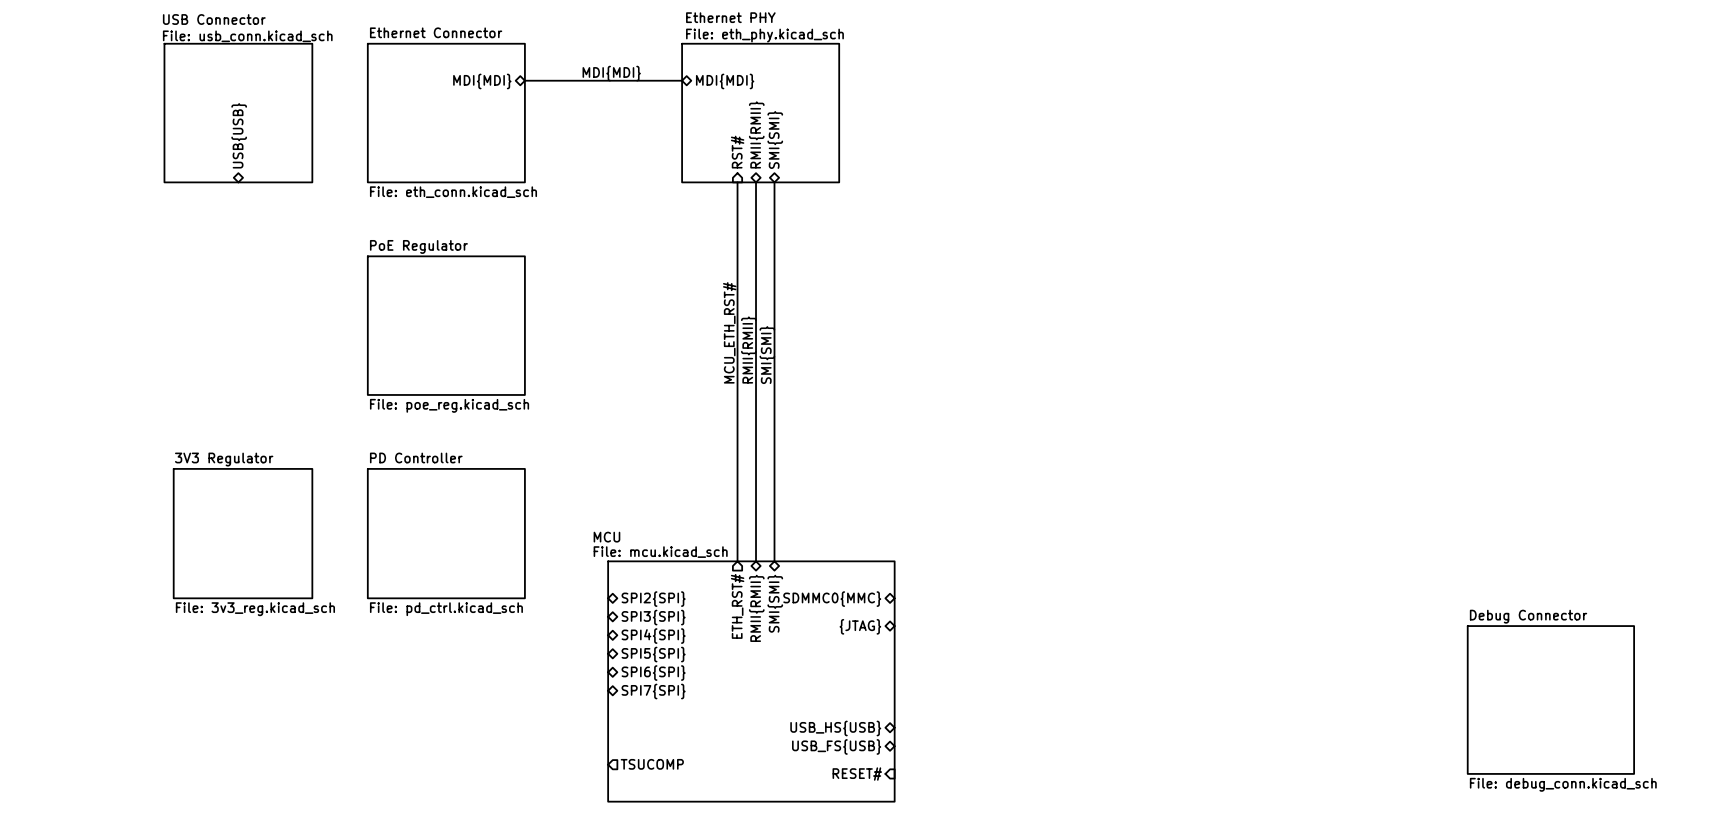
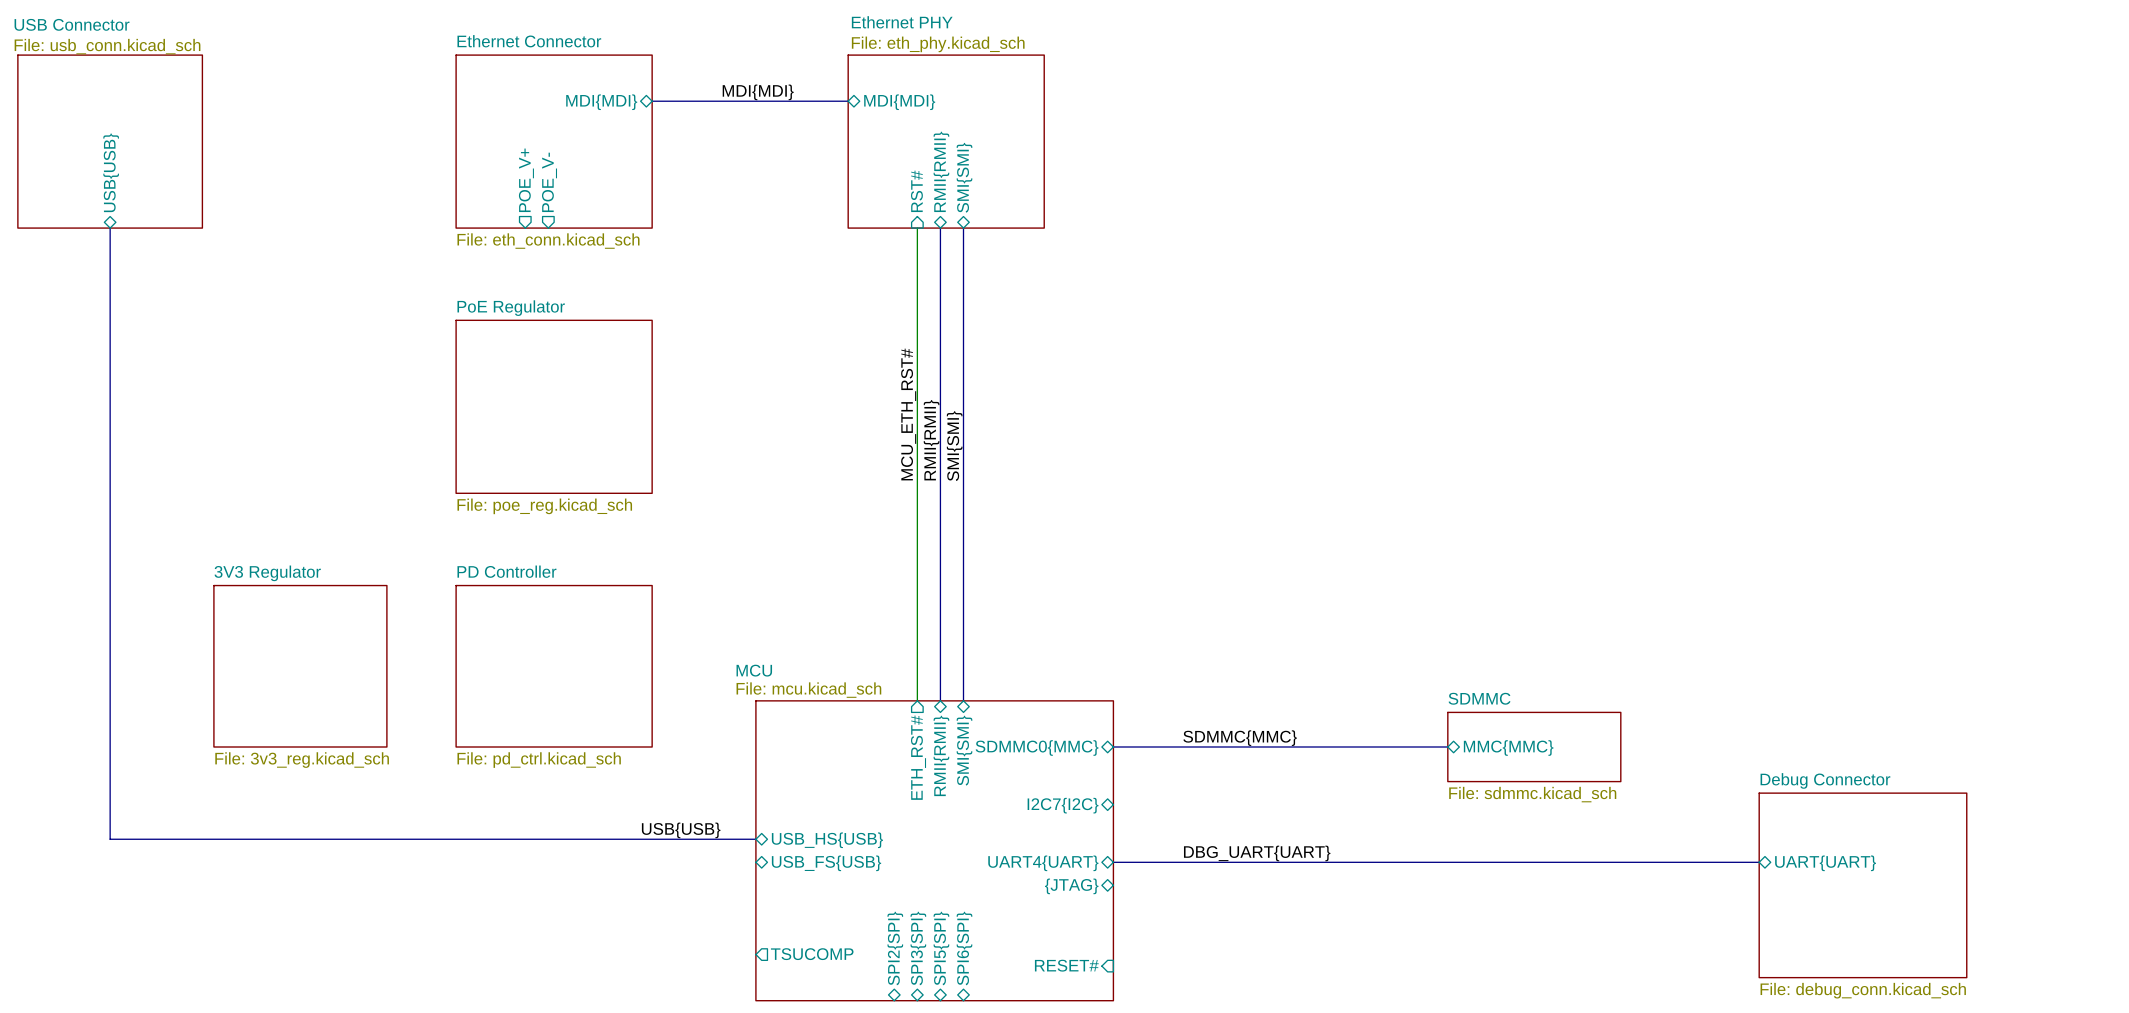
sheet USB Connector position: (238, 113) -> (110, 141)
sheet pin position: USB{USB} (239, 135) -> USB{USB} (111, 172)
sheet pin: none -> POE_V+ (526, 180)
sheet pin: none -> POE_V- (549, 182)
bus: none -> (110, 228) (110, 839) (755, 839)
label: none -> SDMMC{MMC} (1240, 738)
bus: none -> (1113, 747) (1447, 747)
sheet SDMMC: none -> File: sdmmc.kicad_sch (1534, 747)
sheet pin: SPI2{SPI} (653, 599) -> none
sheet pin: none -> MMC{MMC} (1508, 748)
sheet pin: SPI3{SPI} (653, 617) -> none
sheet pin position: {JTAG} (860, 626) -> {JTAG} (1071, 886)
sheet pin: SPI4{SPI} (653, 636) -> none
sheet pin: none -> I2C7{I2C} (1063, 805)
sheet pin: SPI5{SPI} (653, 654) -> none
label: none -> USB{USB} (681, 830)
sheet pin: SPI6{SPI} (653, 673) -> USB_HS{USB} (827, 840)
label: none -> DBG_UART{UART} (1257, 853)
bus: none -> (1113, 862) (1759, 862)
sheet pin: SPI7{SPI} (653, 691) -> USB_FS{USB} (826, 863)
sheet pin: none -> UART4{UART} (1043, 863)
sheet pin: none -> UART{UART} (1825, 863)
sheet Debug Connector position: (1550, 700) -> (1862, 885)
sheet pin: USB_HS{USB} (835, 728) -> none
sheet pin: USB_FS{USB} (836, 746) -> none
sheet pin: none -> SPI2{SPI} (895, 948)
sheet pin: none -> SPI3{SPI} (918, 948)
sheet pin: none -> SPI5{SPI} (941, 948)
sheet pin: none -> SPI6{SPI} (964, 948)

